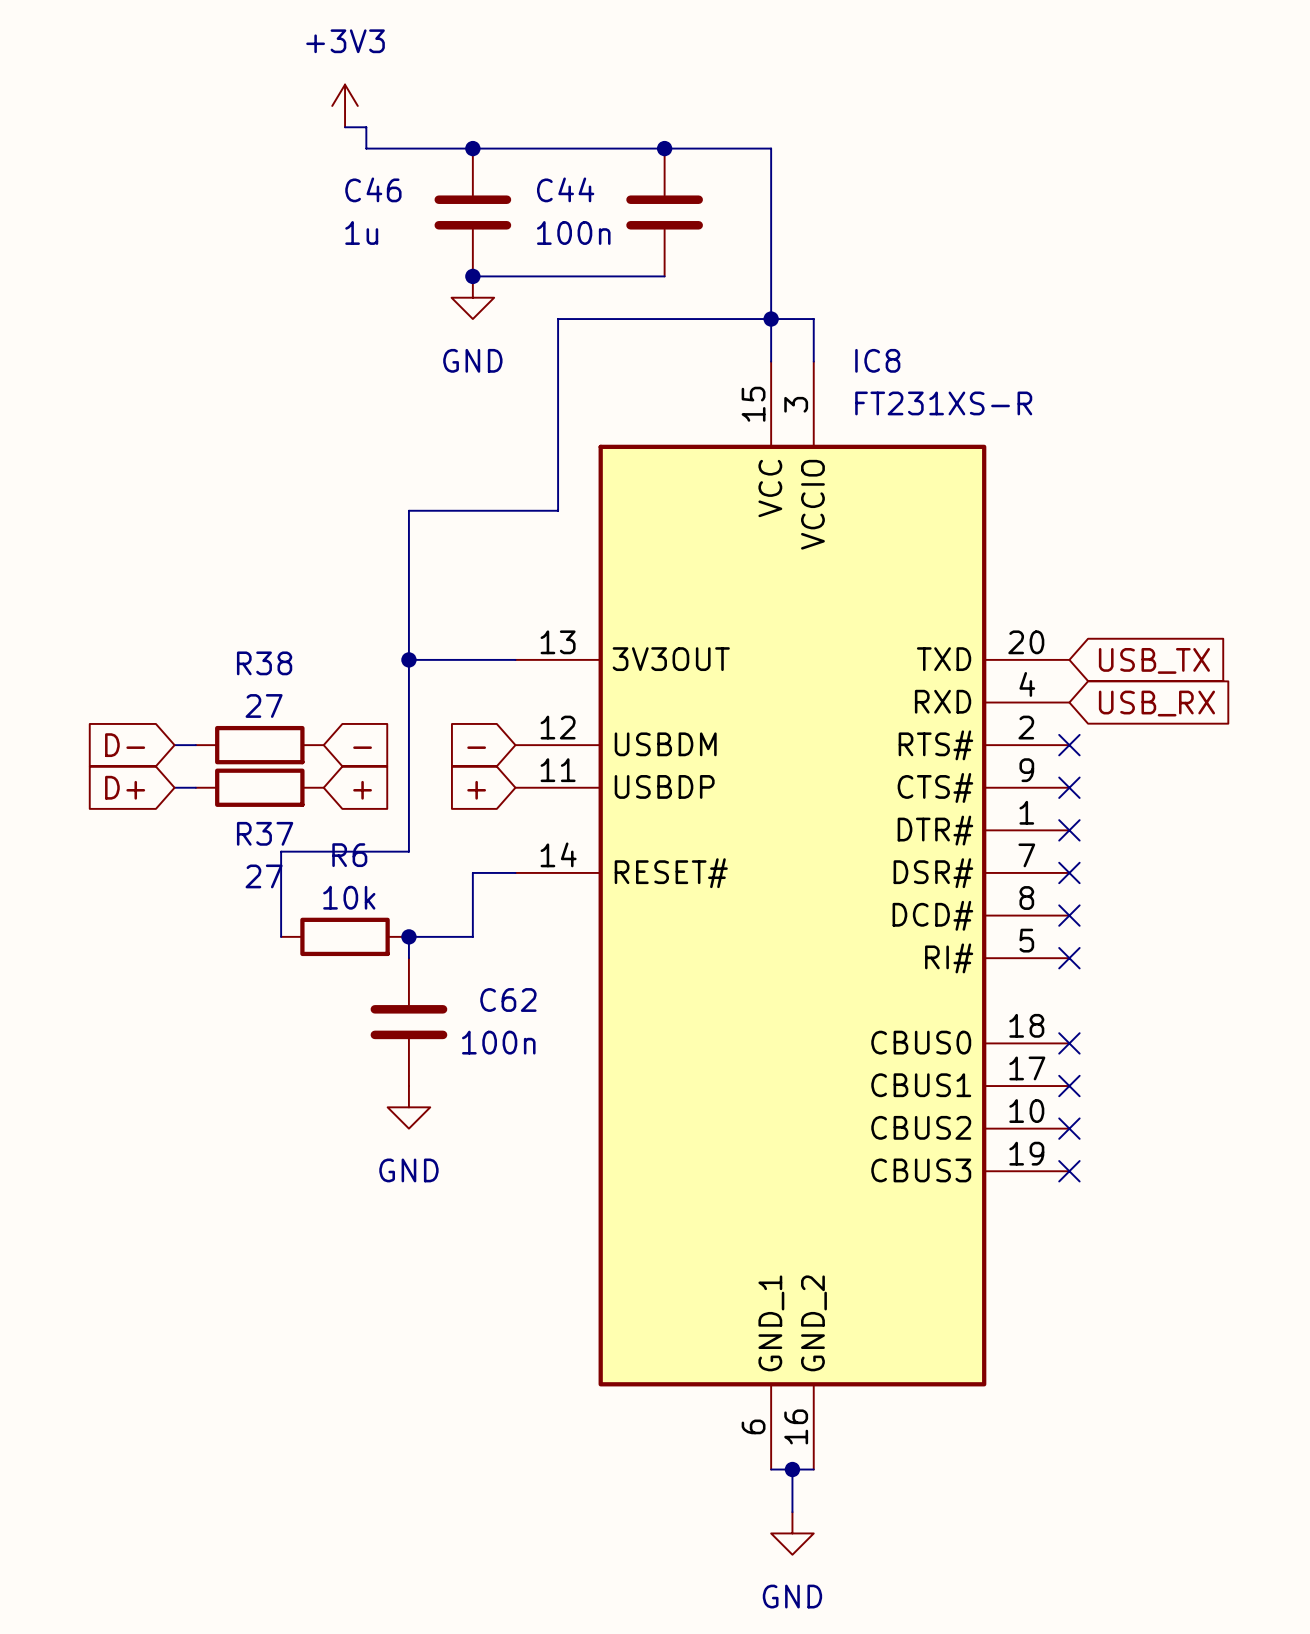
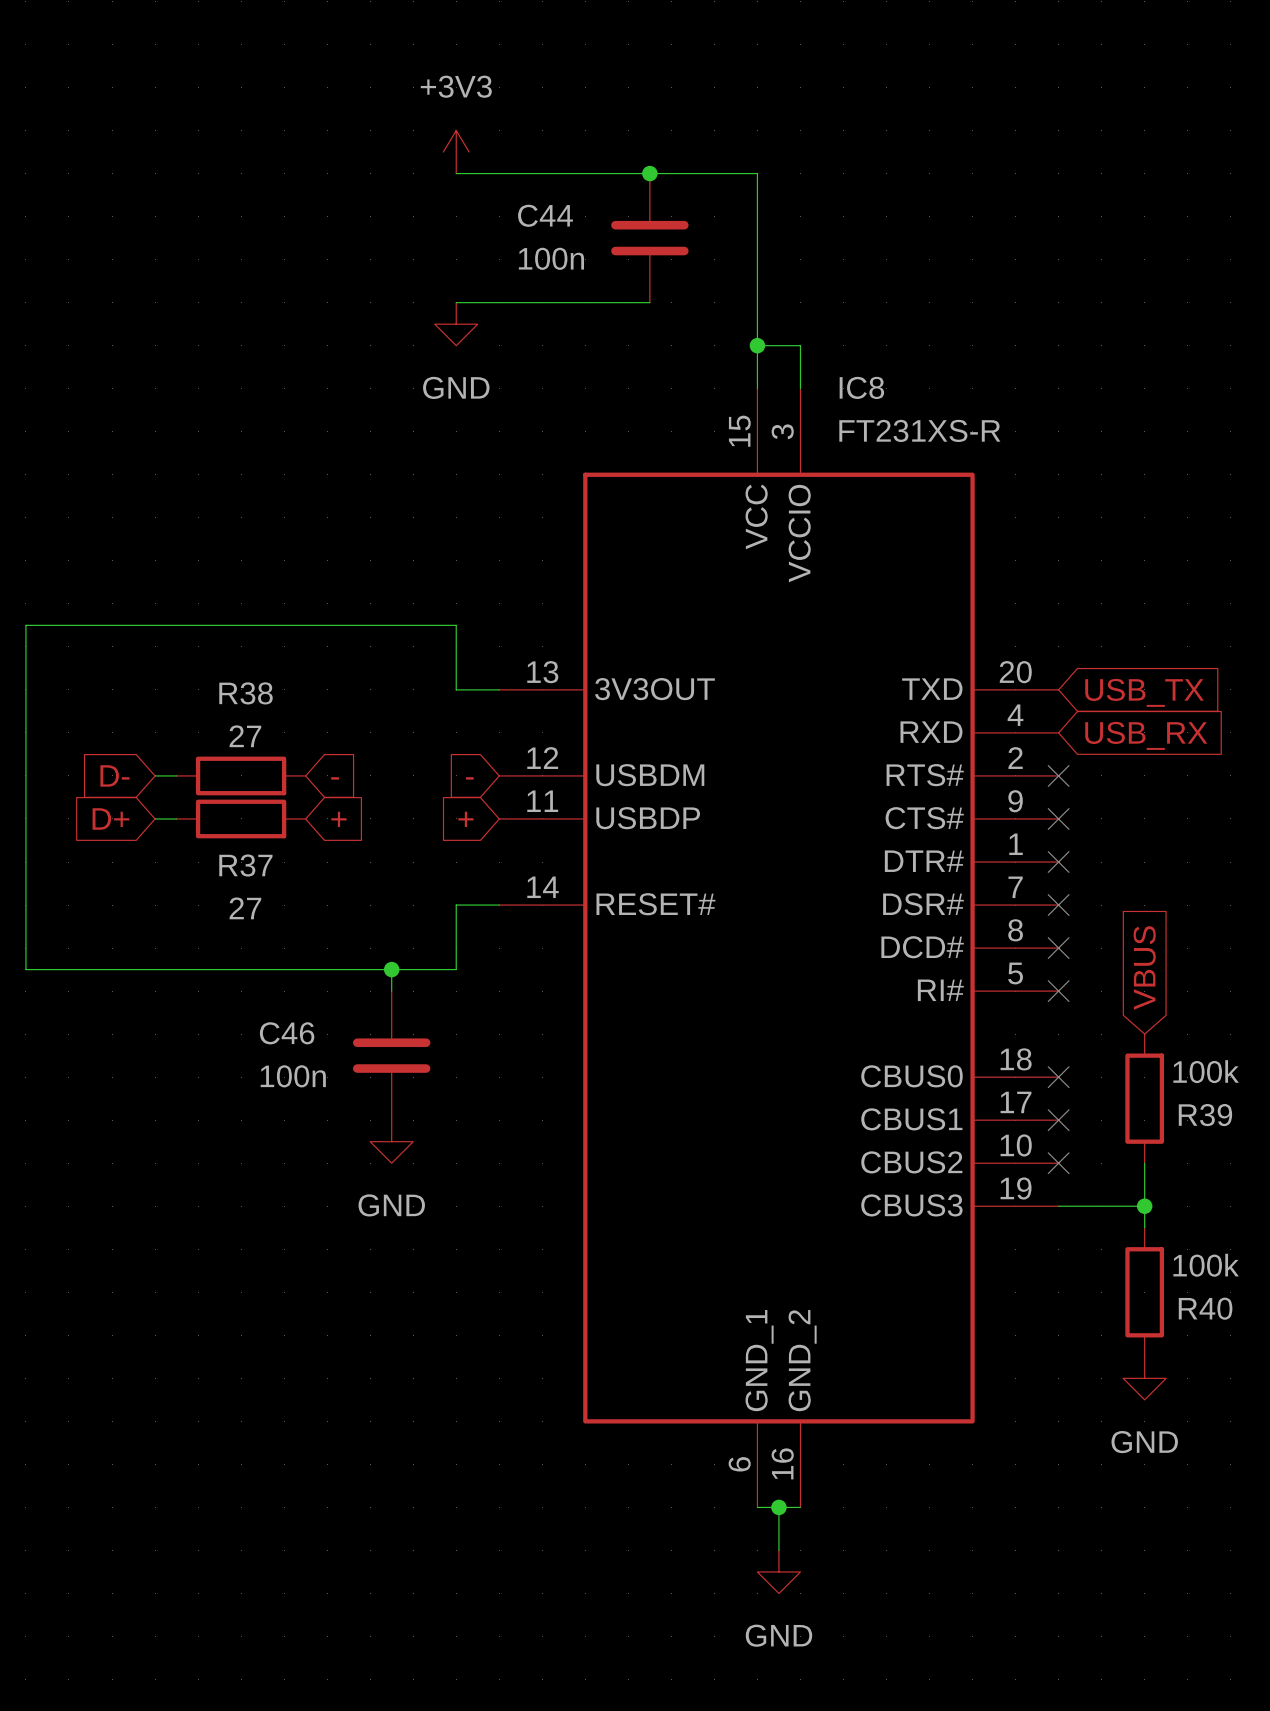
power symbol position: +3V3 (345, 105) -> +3V3 (456, 152)
wire: (345, 127) (366, 127) (366, 148) (472, 148) -> none
junction: (472, 148) -> none
C46: 1u (472, 212) -> none
junction: (472, 276) -> none
wire: (771, 319) (558, 319) (558, 510) (408, 510) (408, 851) (281, 851) (281, 936) -> none
wire: (408, 659) (472, 659) -> (391, 969) (25, 969) (25, 625) (456, 625) (456, 689)
junction: (408, 659) -> none
global label: none -> VBUS (1144, 967)
R6: 10k (345, 936) -> none
C62 name: C62 (508, 1000) -> C46 (287, 1033)
C62 value position: 100n (498, 1042) -> 100n (293, 1076)
R39: none -> 100k (1144, 1098)
wire: none -> (1144, 1163) (1144, 1227)
wire: none -> (1058, 1206) (1144, 1206)
no-connect mark: (1069, 1171) -> none
junction: none -> (1144, 1206)
R40: none -> 100k (1144, 1292)
power symbol: none -> GND (1144, 1378)

